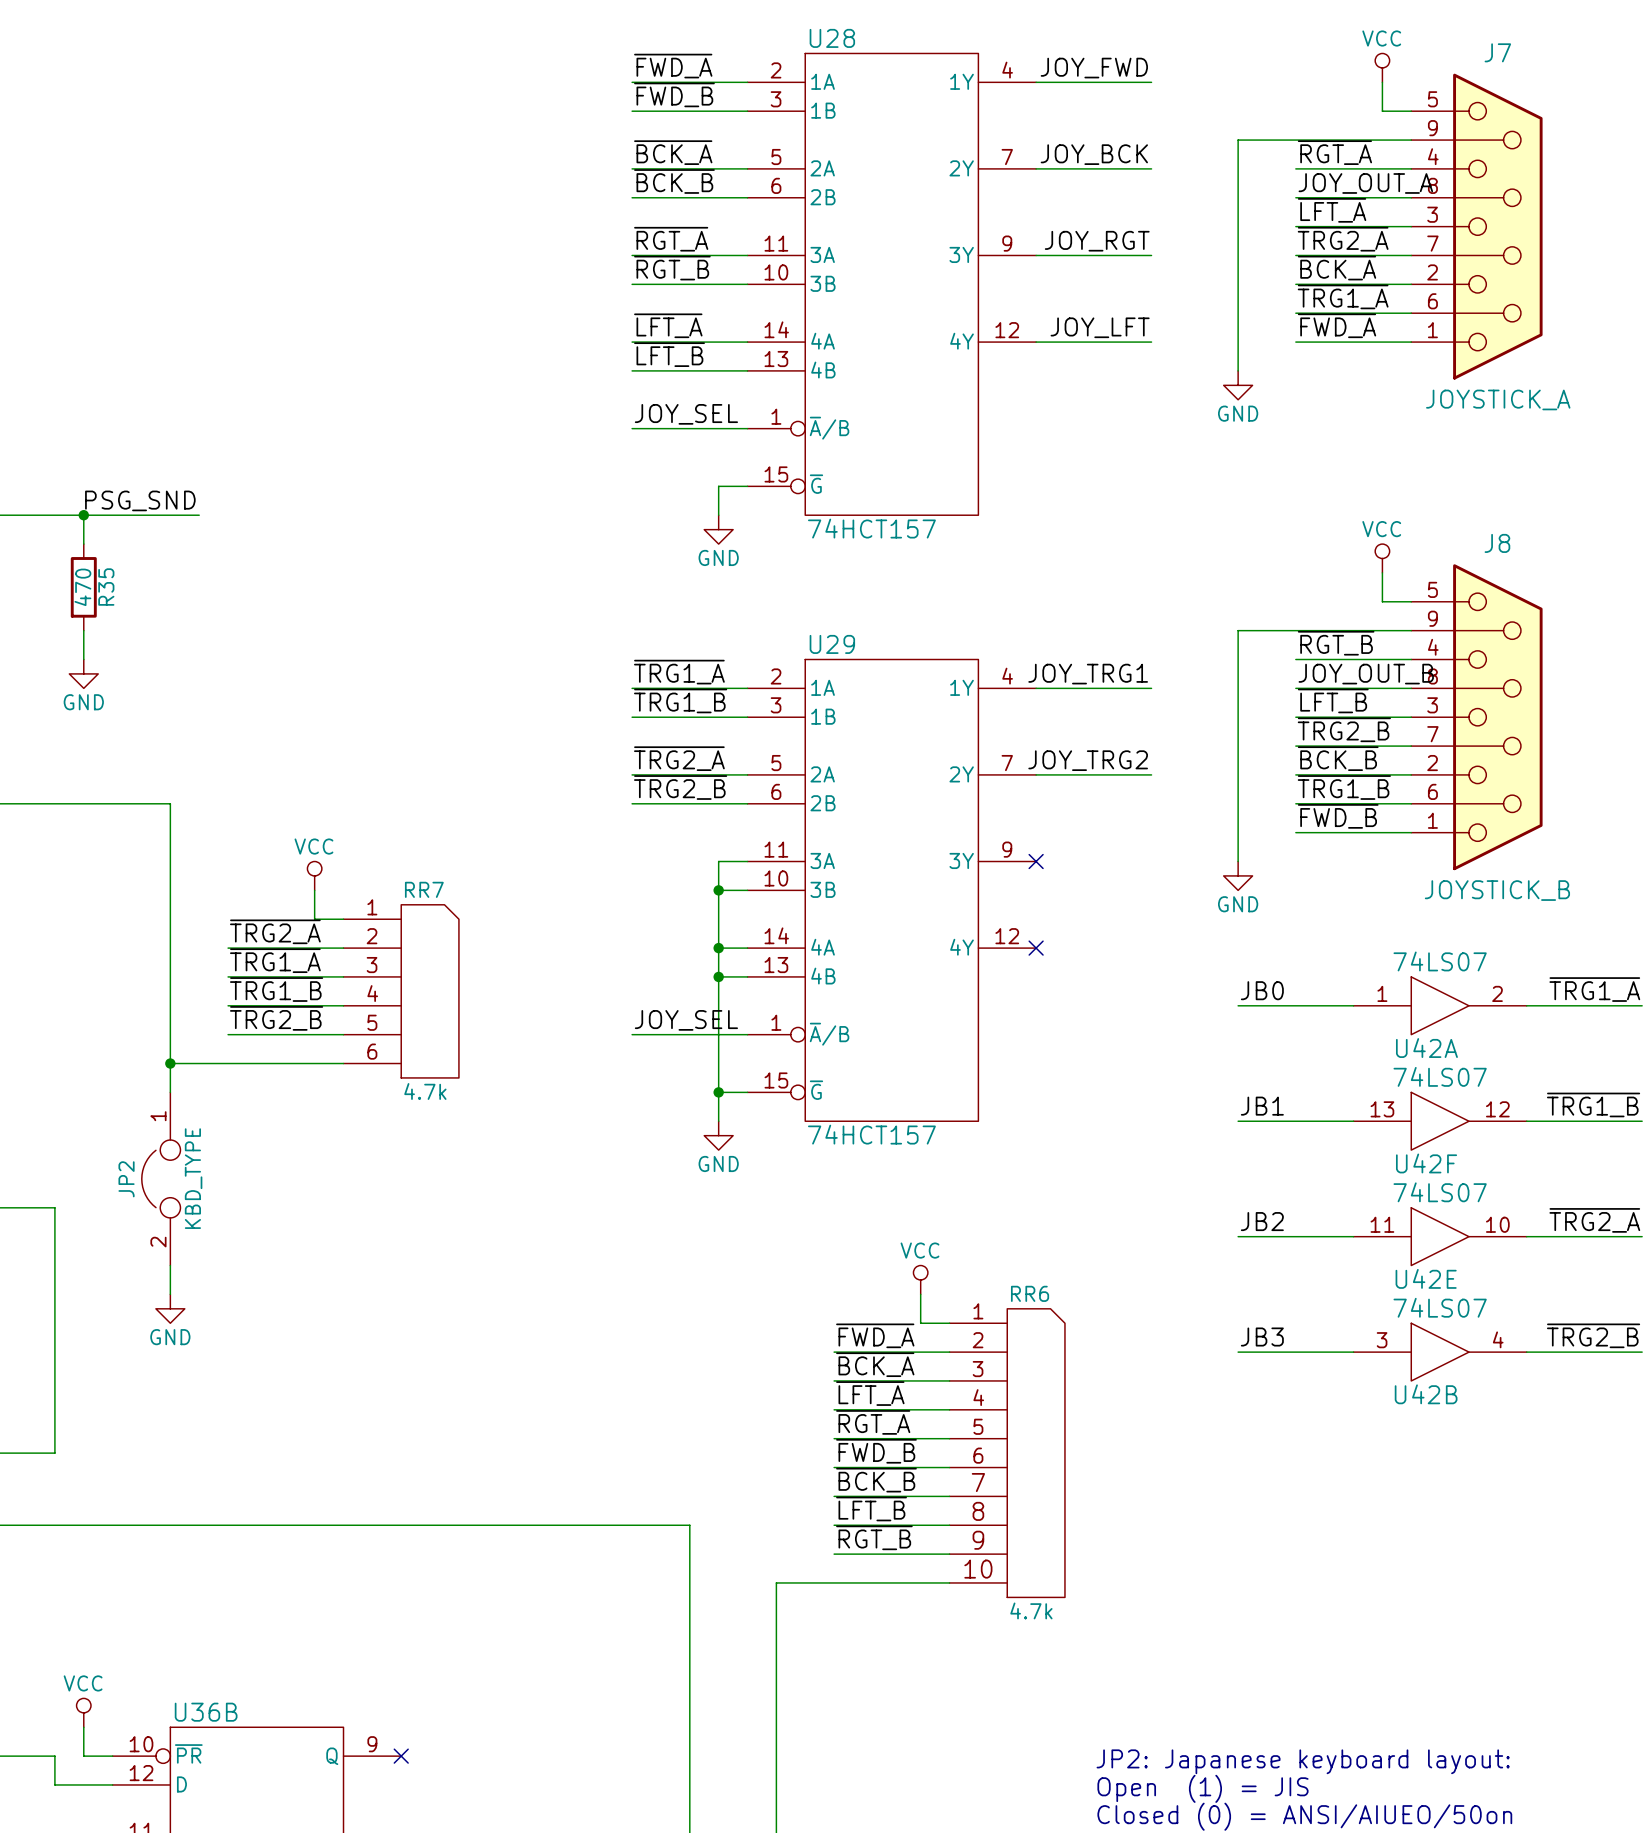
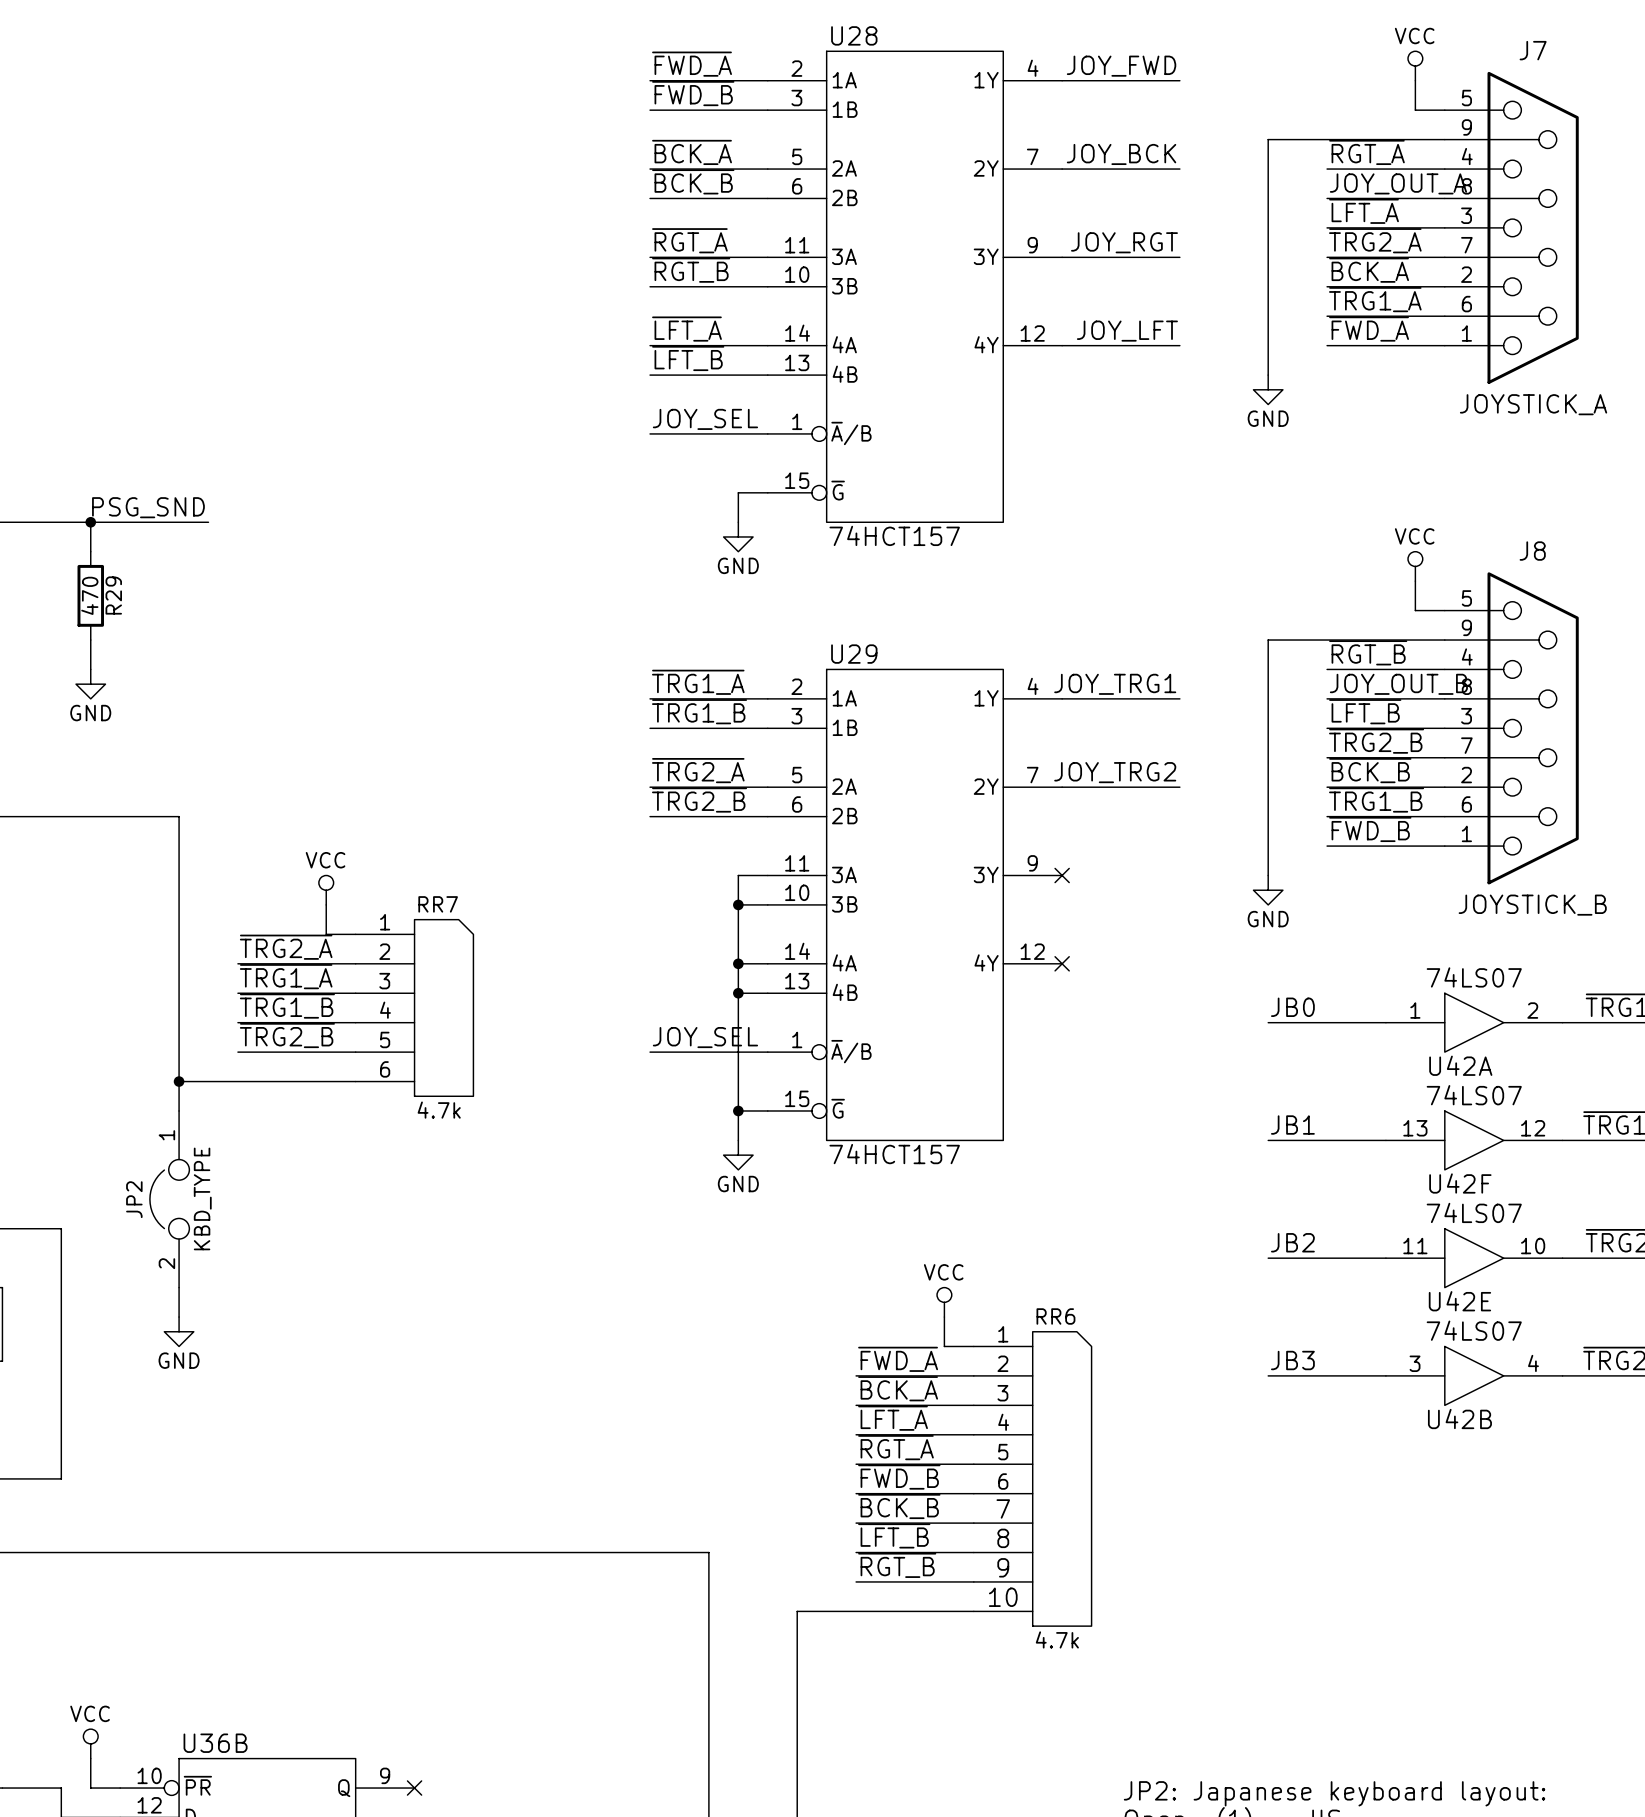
R35 name: R35 (106, 587) -> R29 (113, 595)

